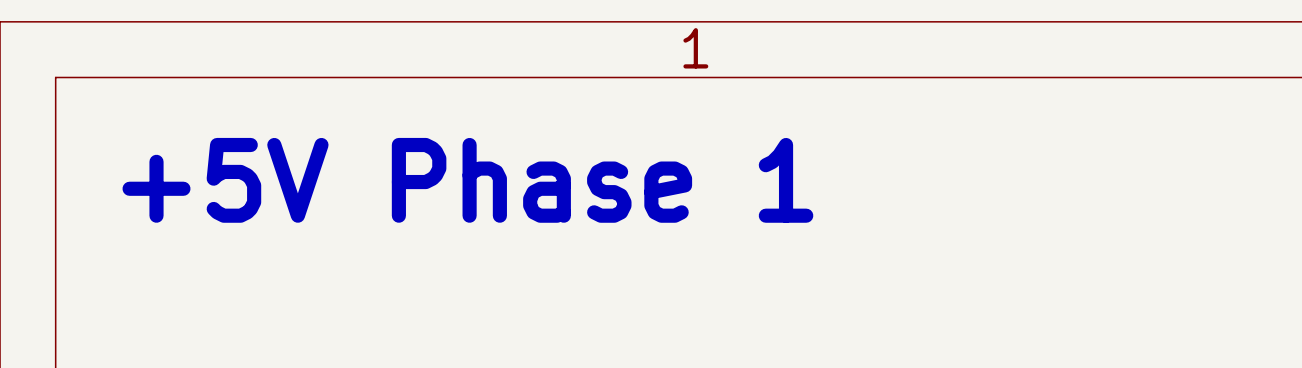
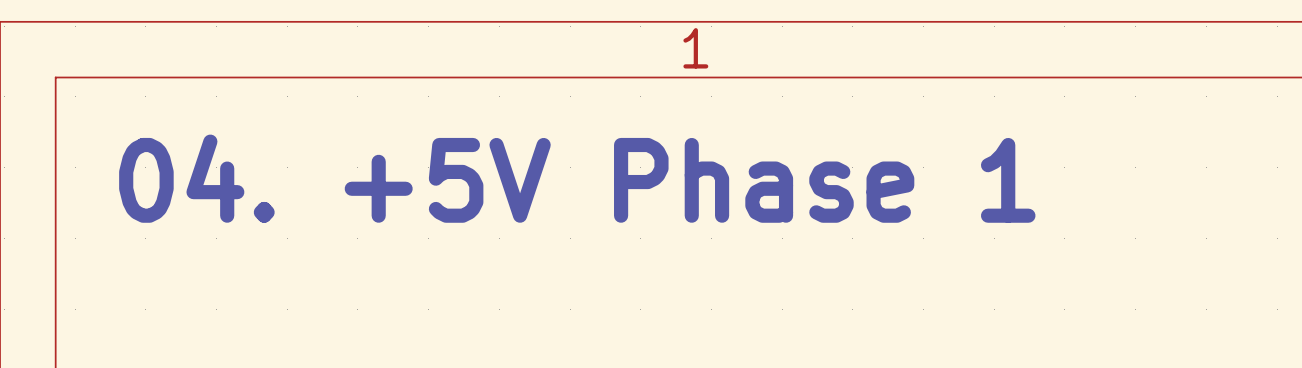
text: +5V Phase 1 (467, 180) -> 04. +5V Phase 1 (577, 178)

